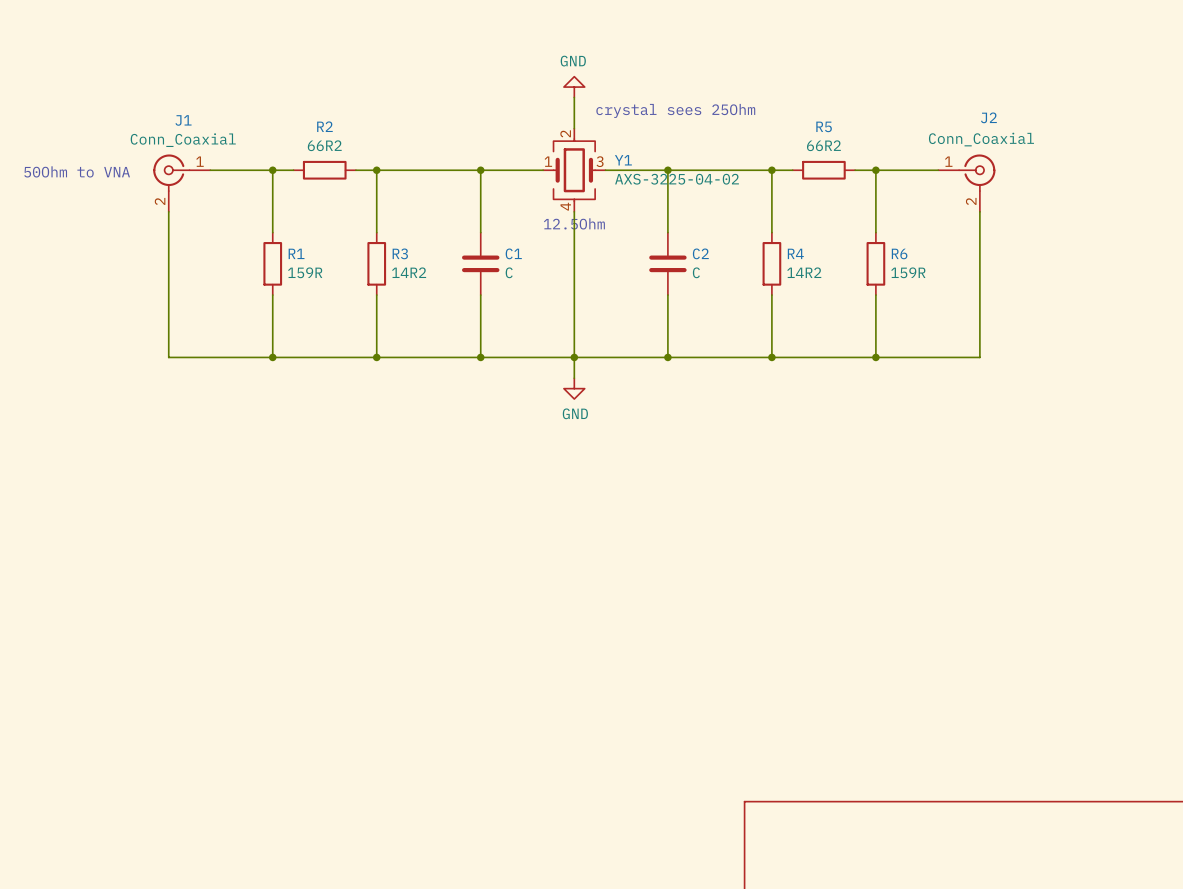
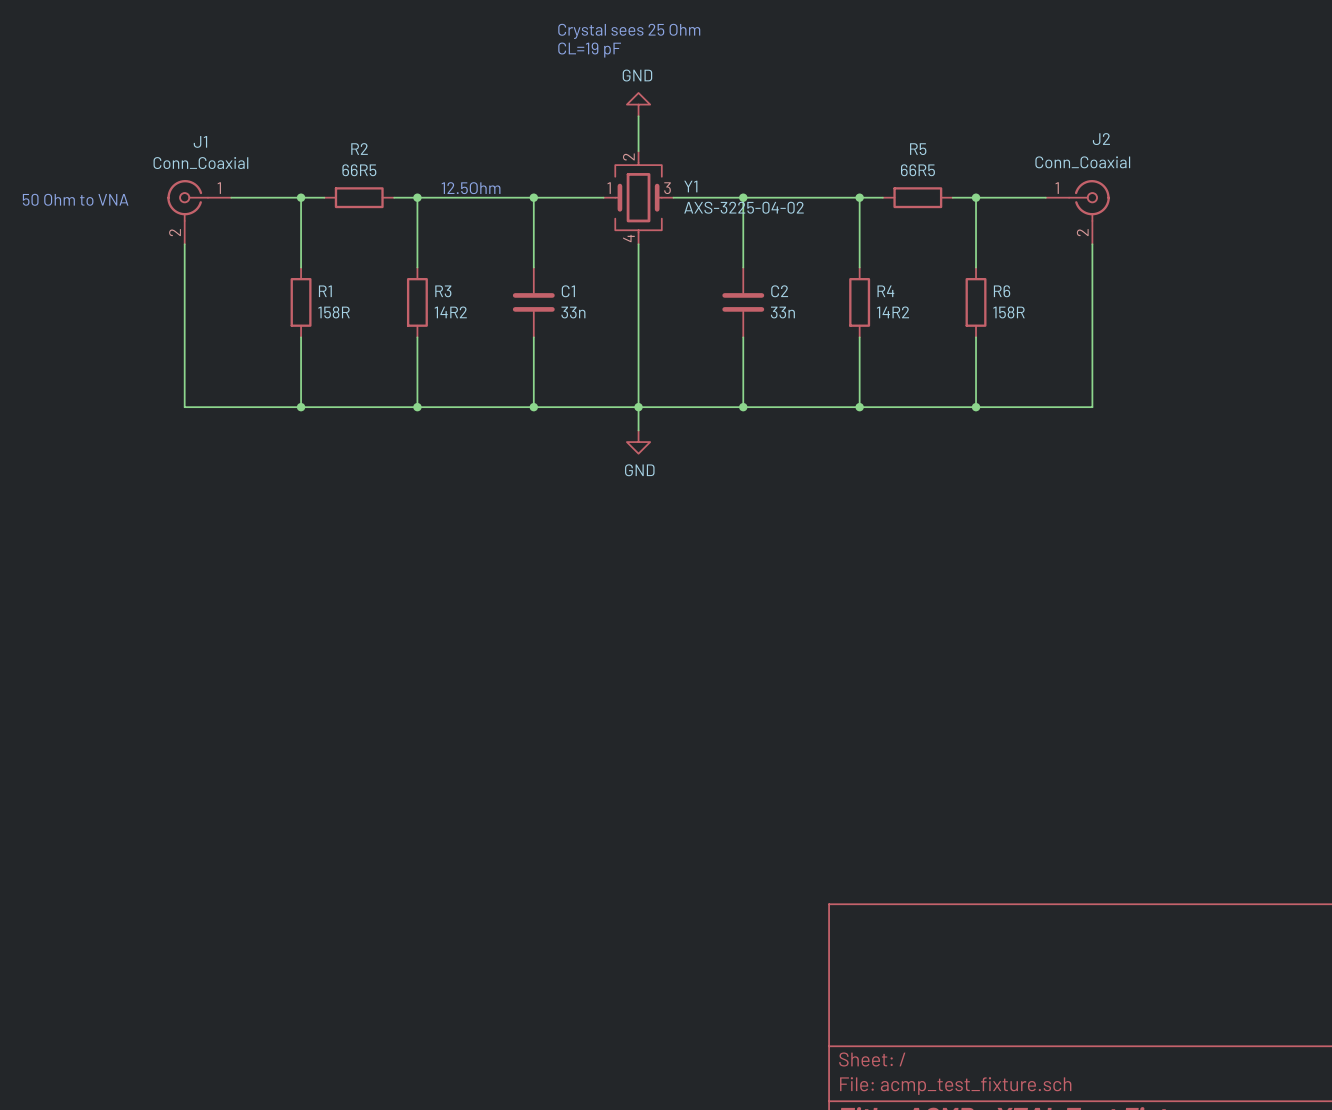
text: none -> Crystal sees 25 Ohm (629, 31)
text: none -> CL=19 pF (589, 50)
text: crystal sees 25Ohm (675, 110) -> none
R2 value: 66R2 (324, 145) -> 66R5 (359, 170)
R5 value: 66R2 (823, 145) -> 66R5 (917, 170)
text: 50Ohm to VNA (77, 171) -> 50 Ohm to VNA (75, 199)
text position: 12.5Ohm (574, 223) -> 12.5Ohm (471, 188)
R1 value: 159R (305, 272) -> 158R (334, 312)
C1 value: C (509, 272) -> 33n (573, 312)
C2 value: C (696, 272) -> 33n (782, 312)
R6 value: 159R (908, 272) -> 158R (1008, 312)

